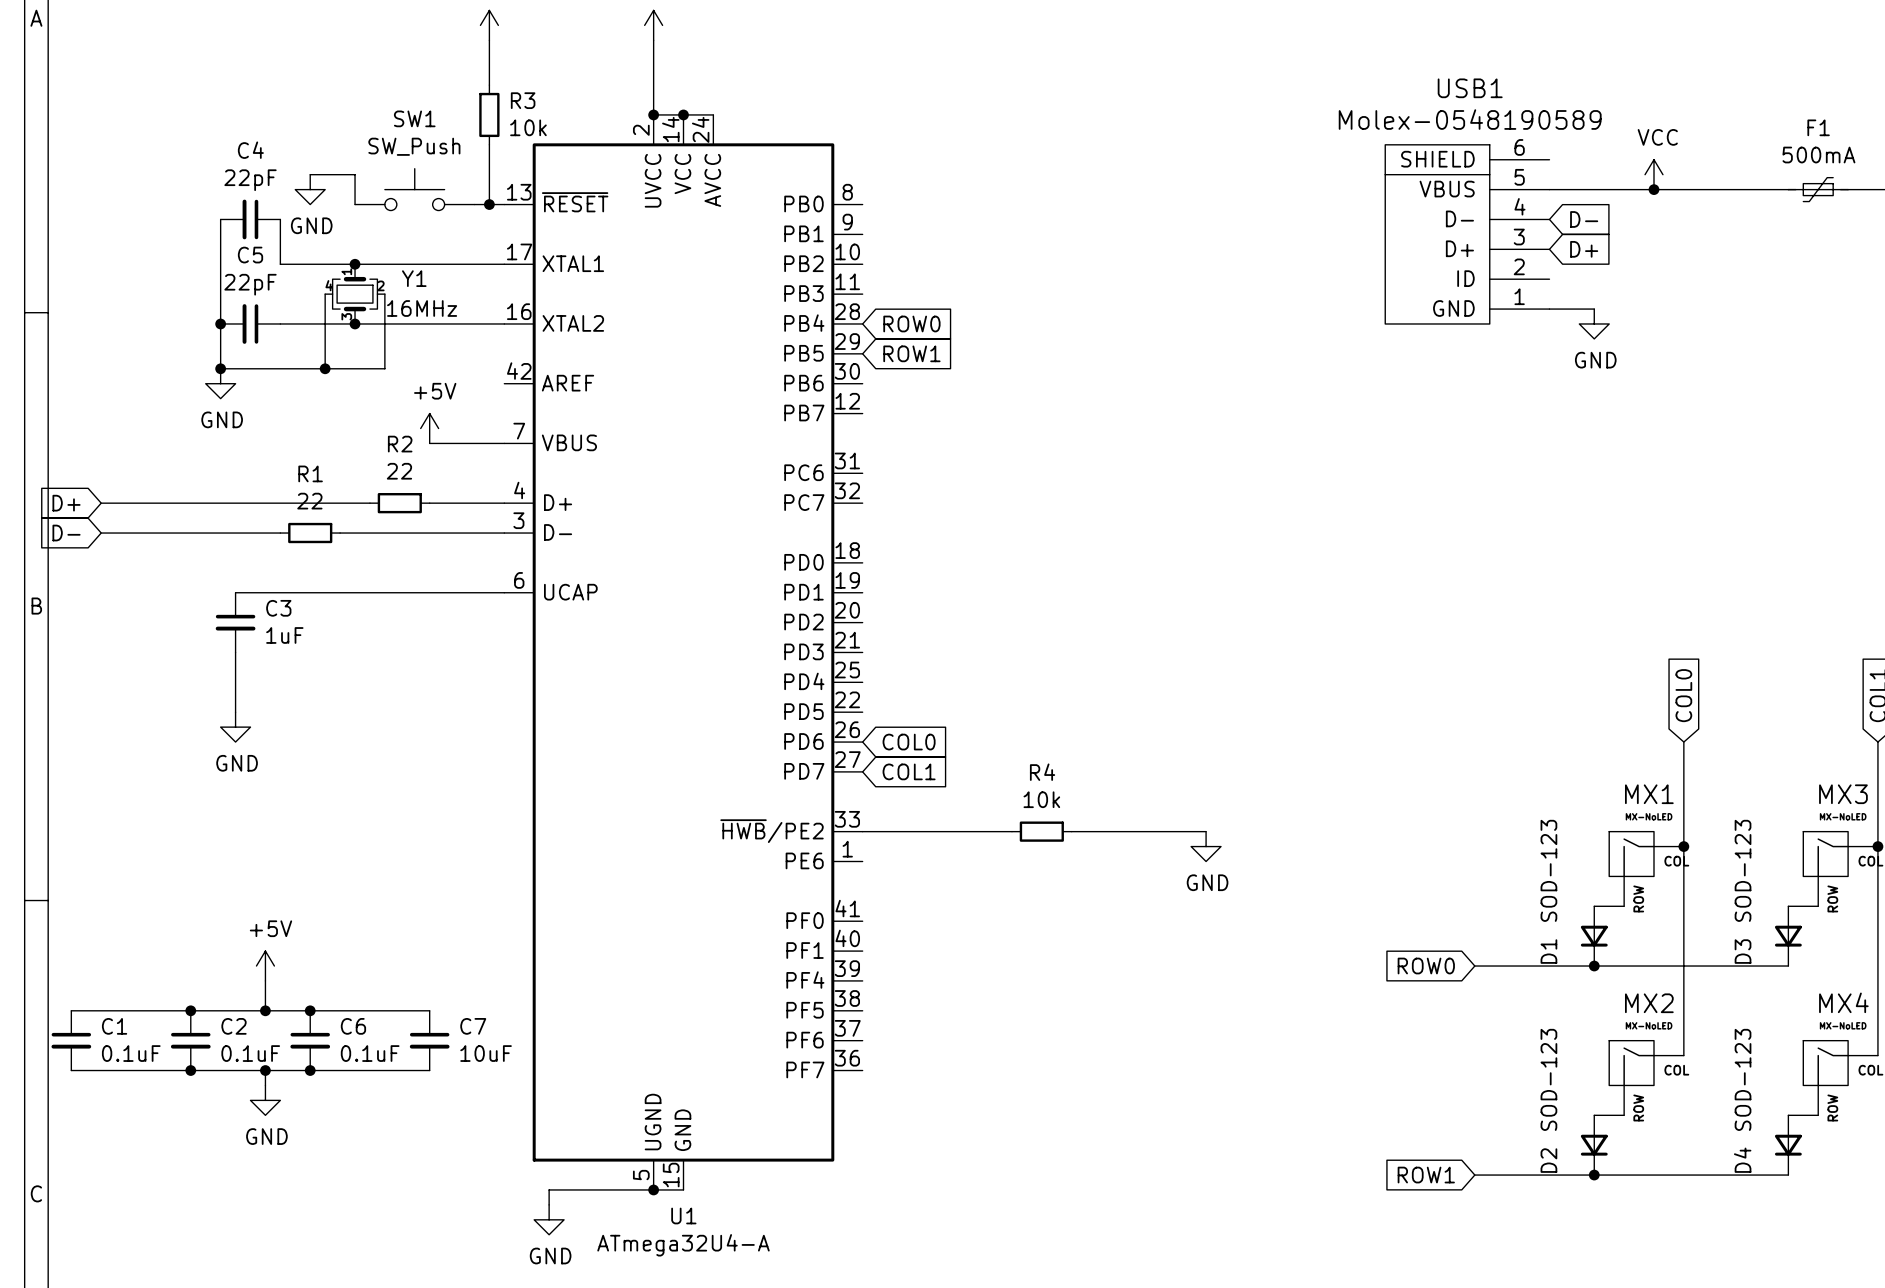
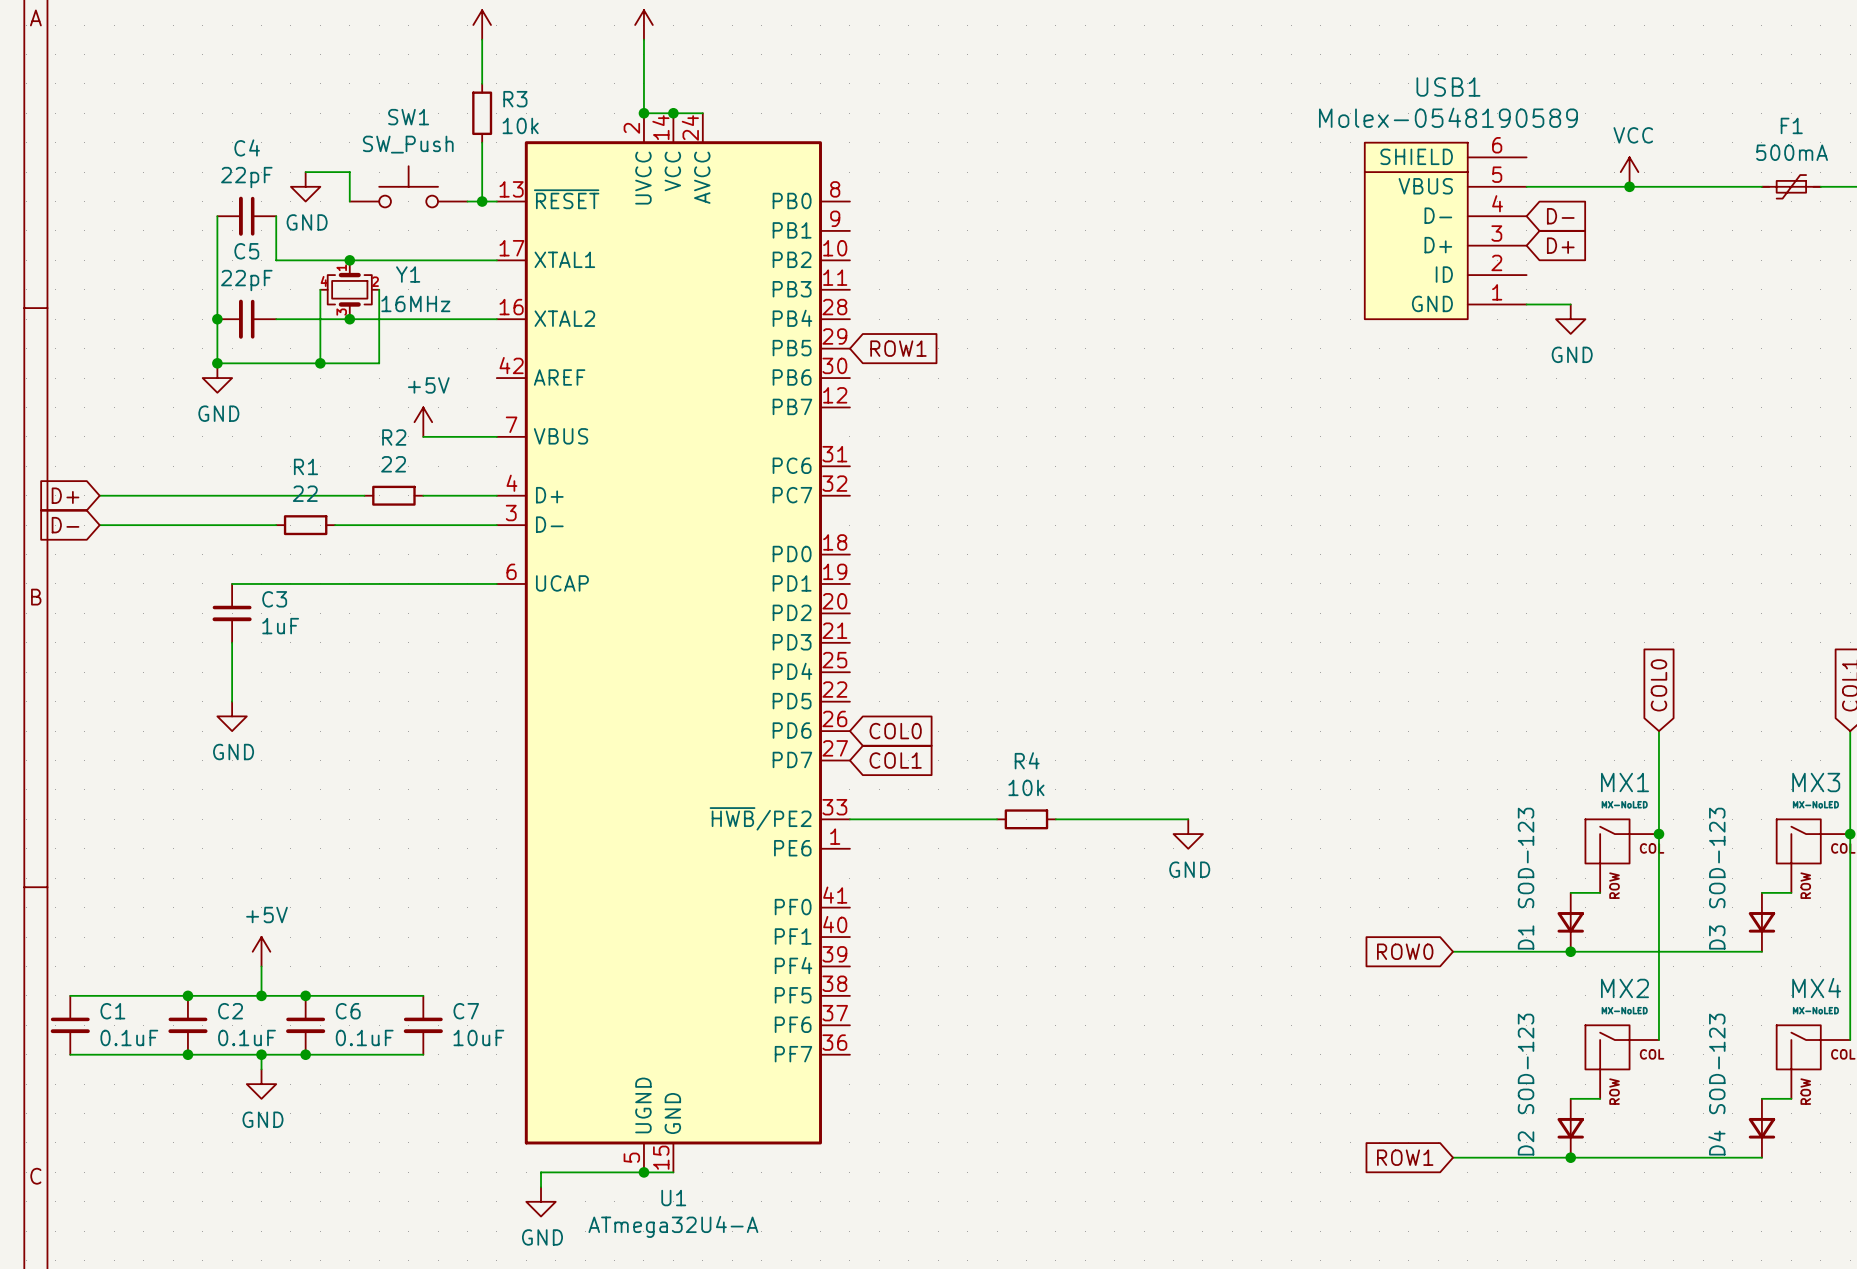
global label: ROW0 (911, 323) -> none

